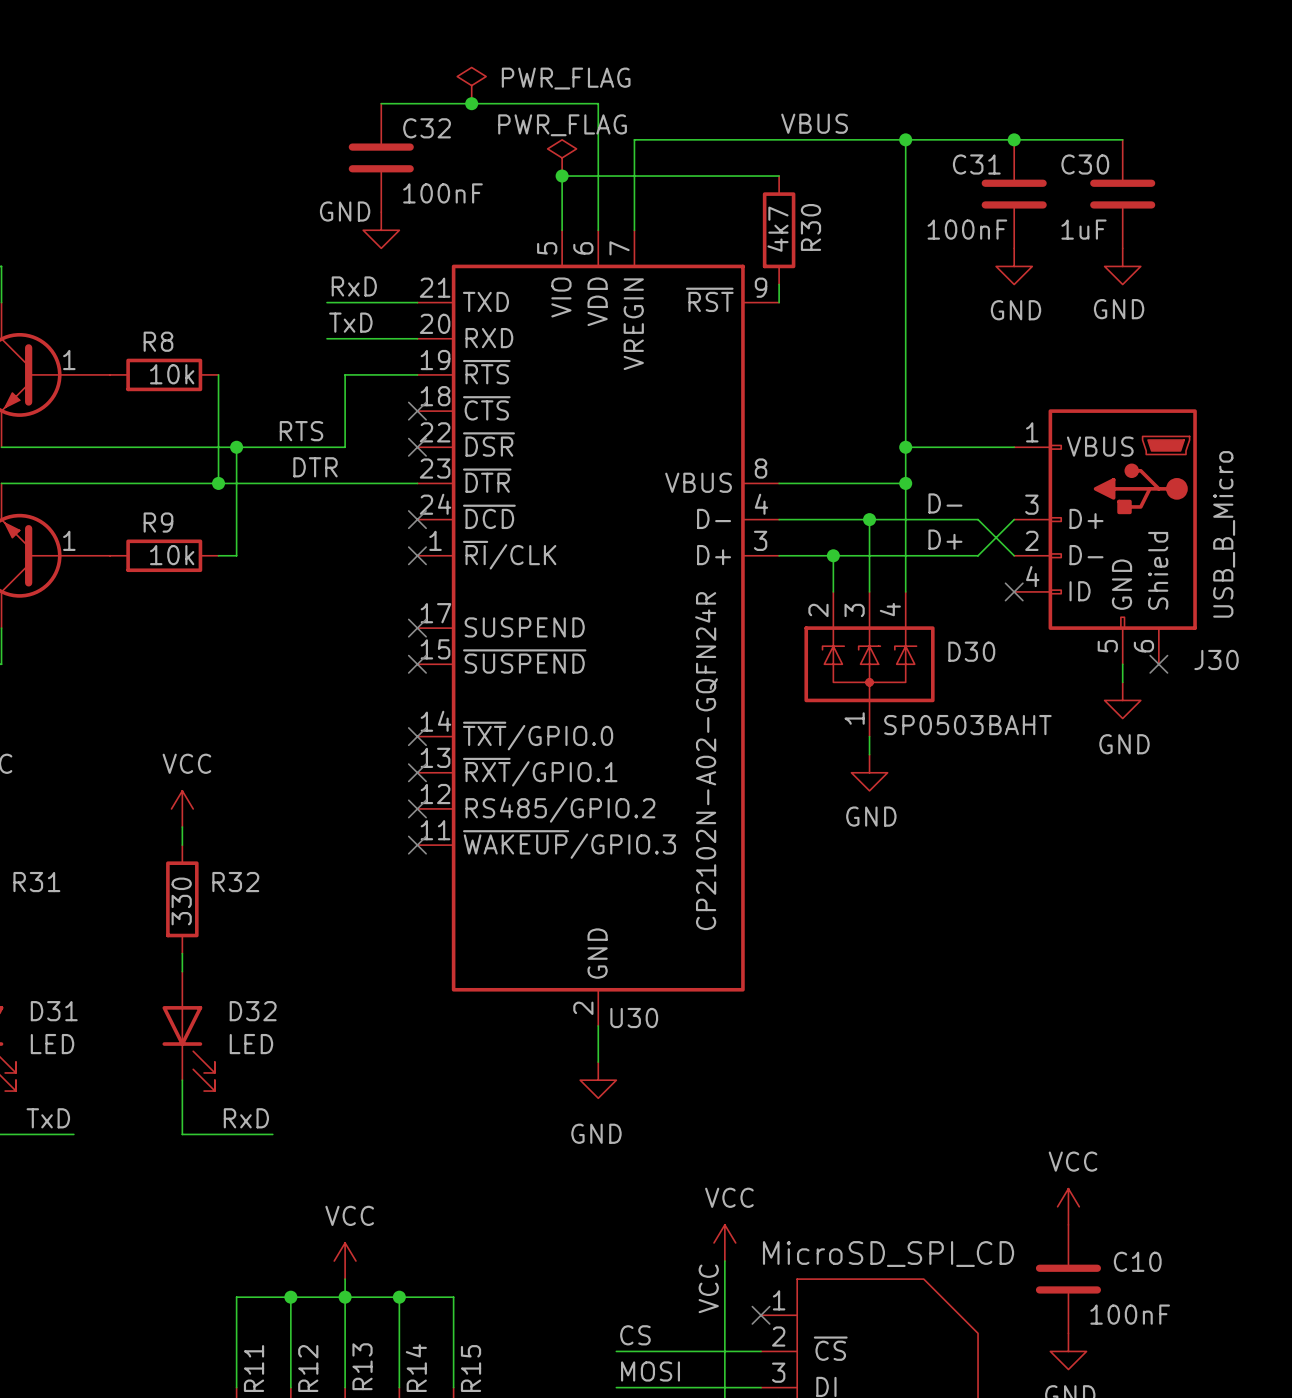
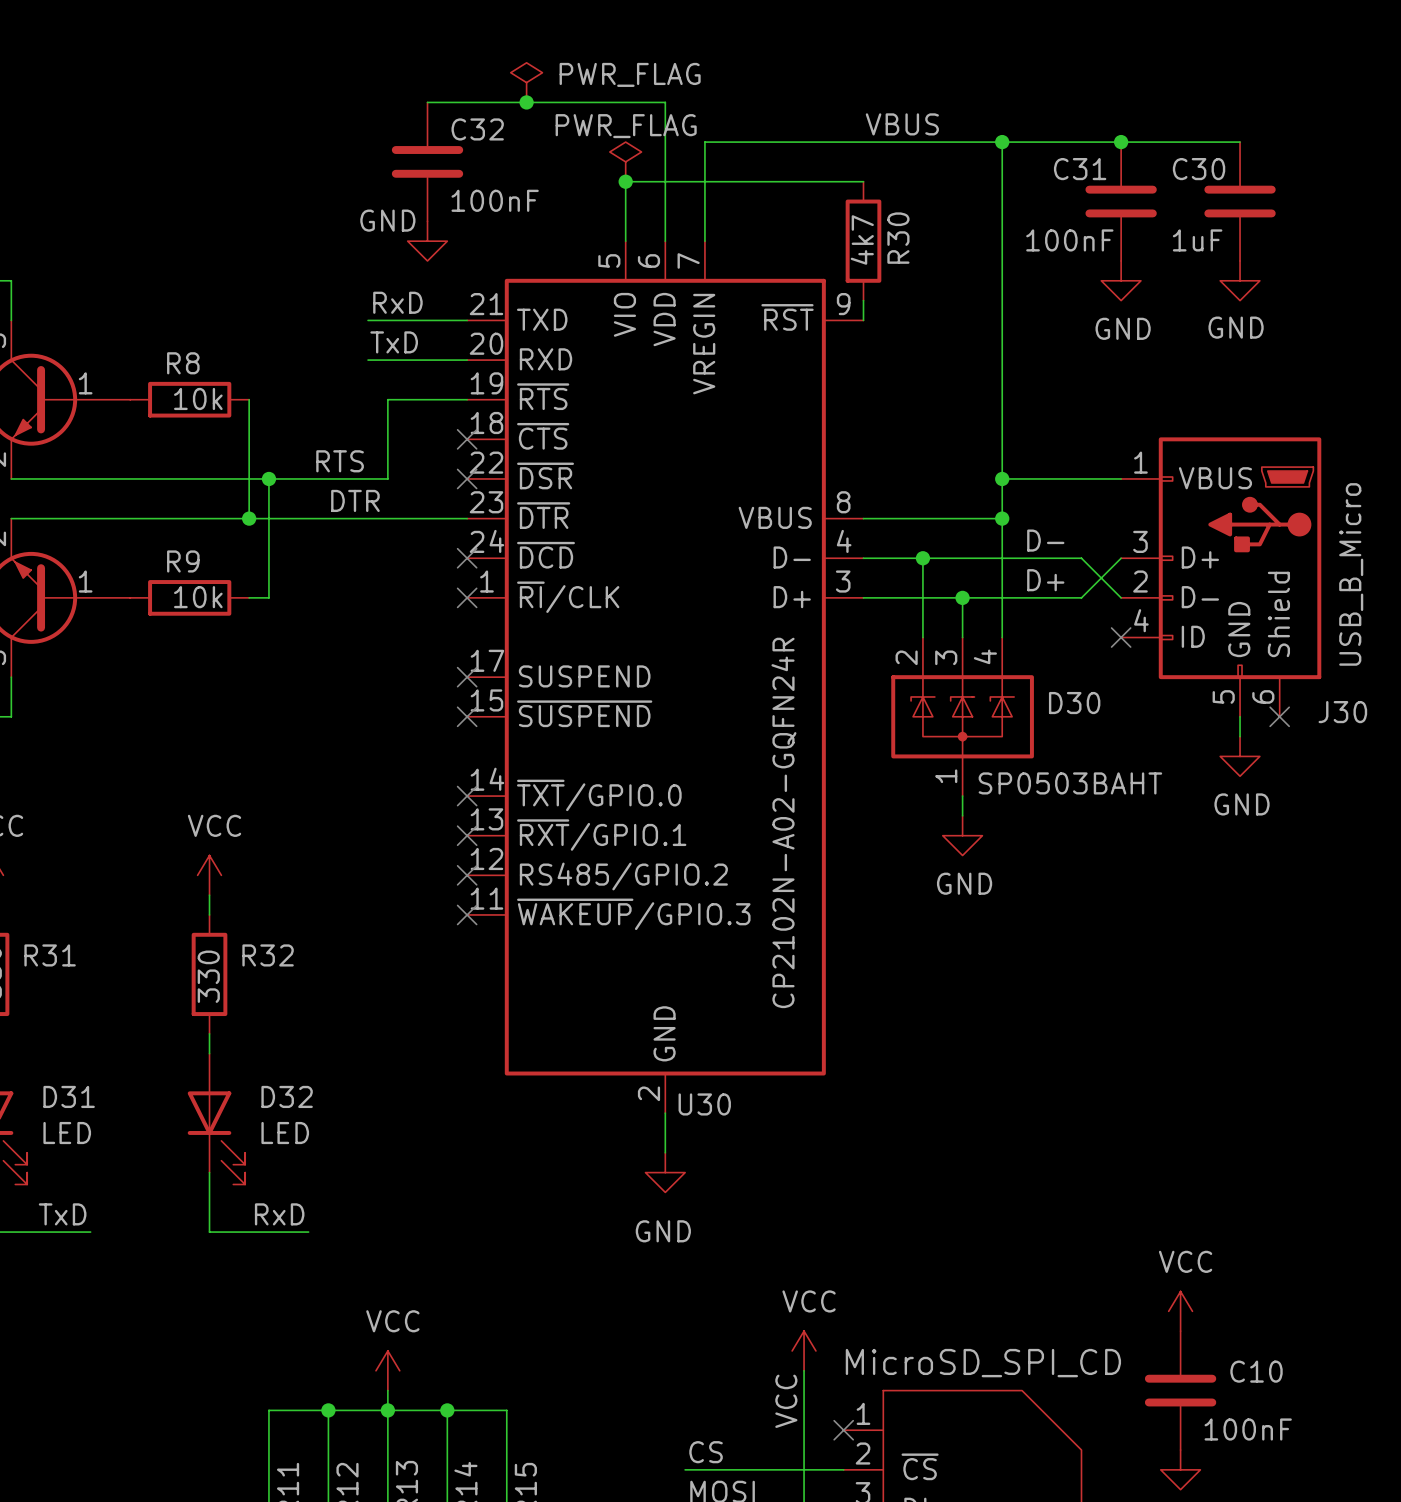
junction: none -> (922, 558)
wire: (869, 519) (869, 555) -> (922, 558) (922, 597)
junction: (869, 519) -> none
junction: (833, 555) -> none
junction: none -> (962, 597)

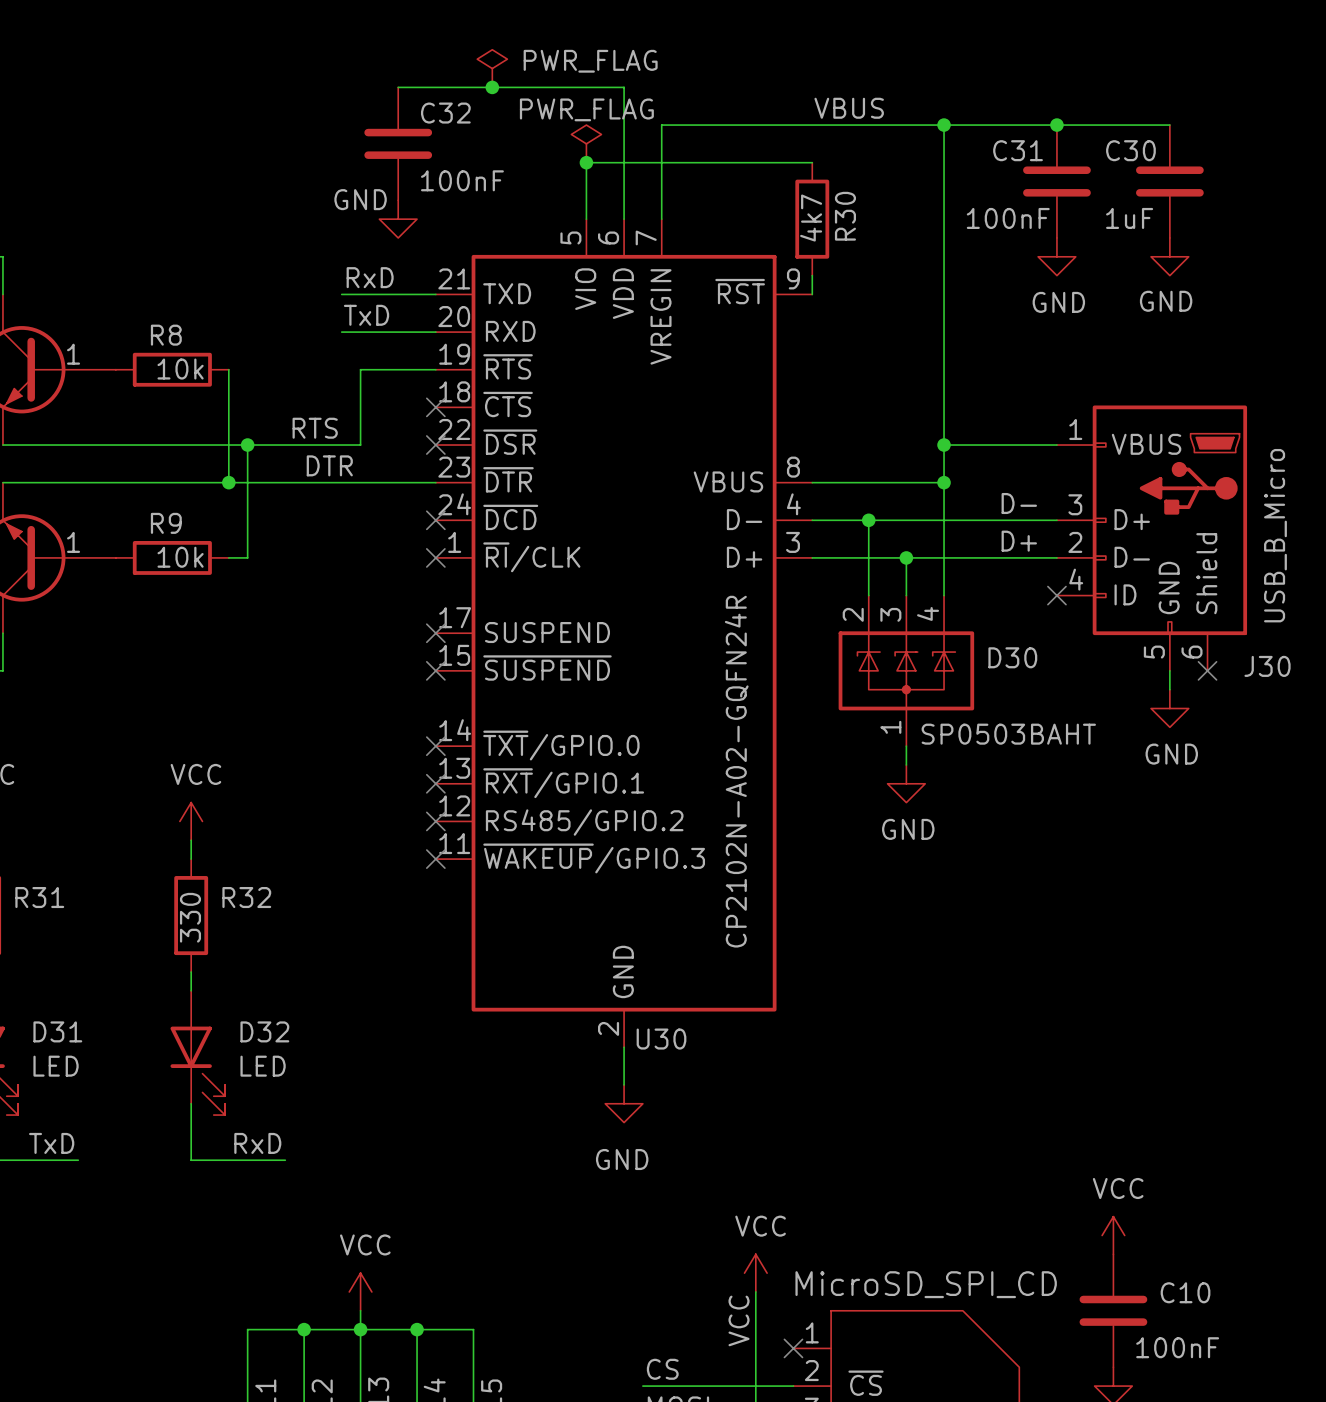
label position: D- (1045, 540) -> D- (1019, 503)
wire: (1081, 558) (1121, 597) -> (1019, 520) (1056, 520)
wire: (1121, 558) (1081, 597) -> (1056, 557) (1019, 557)
label position: D+ (1045, 580) -> D+ (1019, 541)

